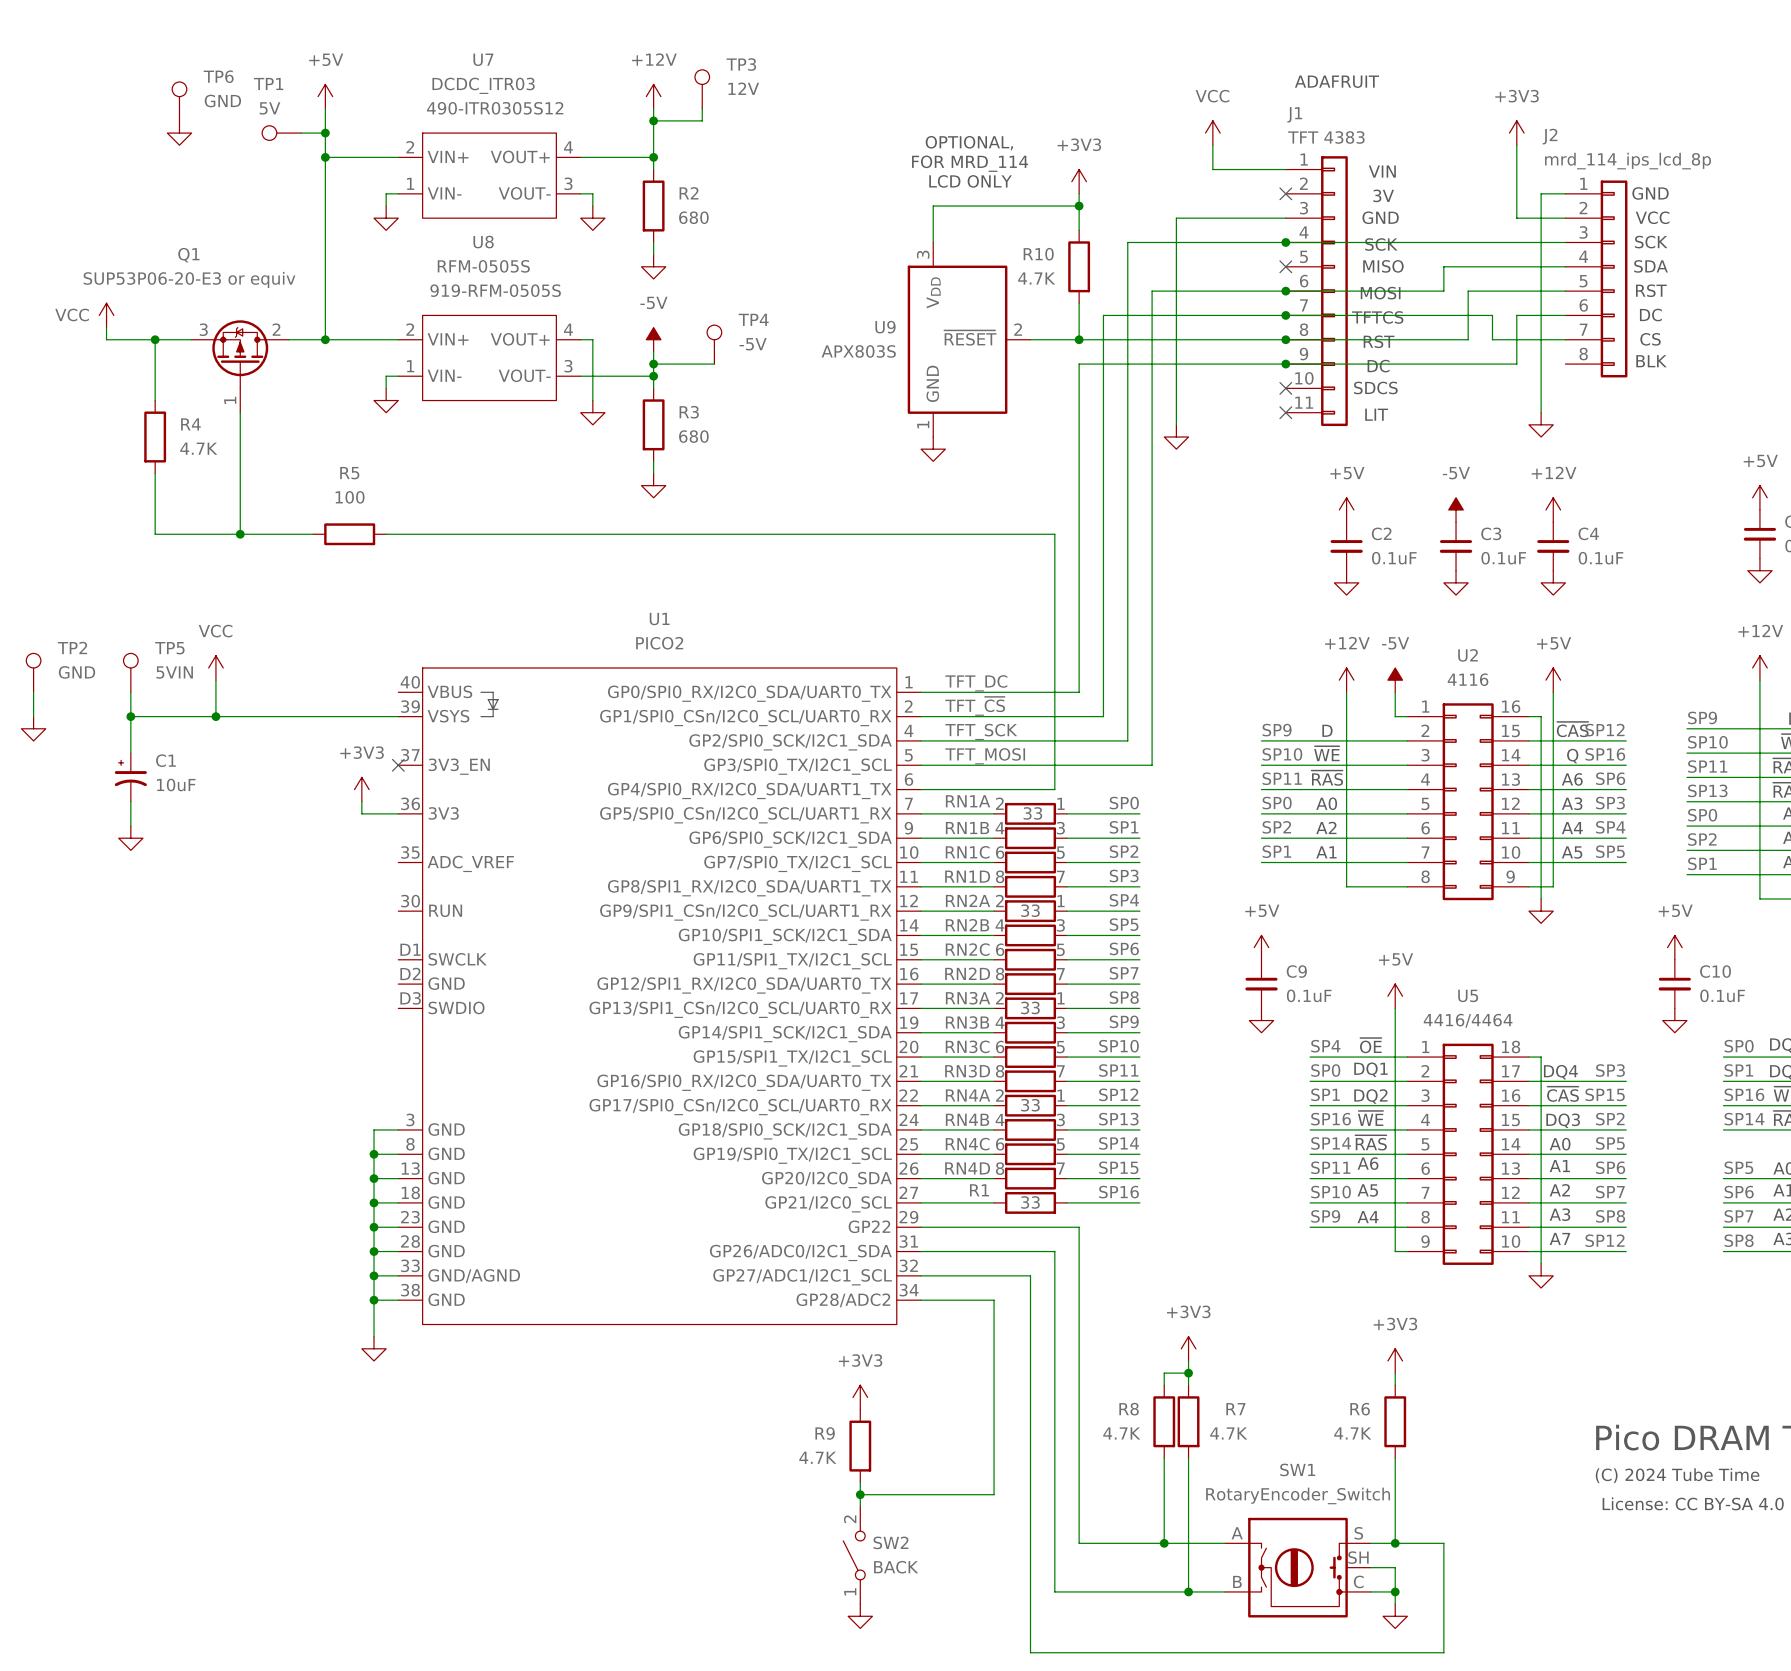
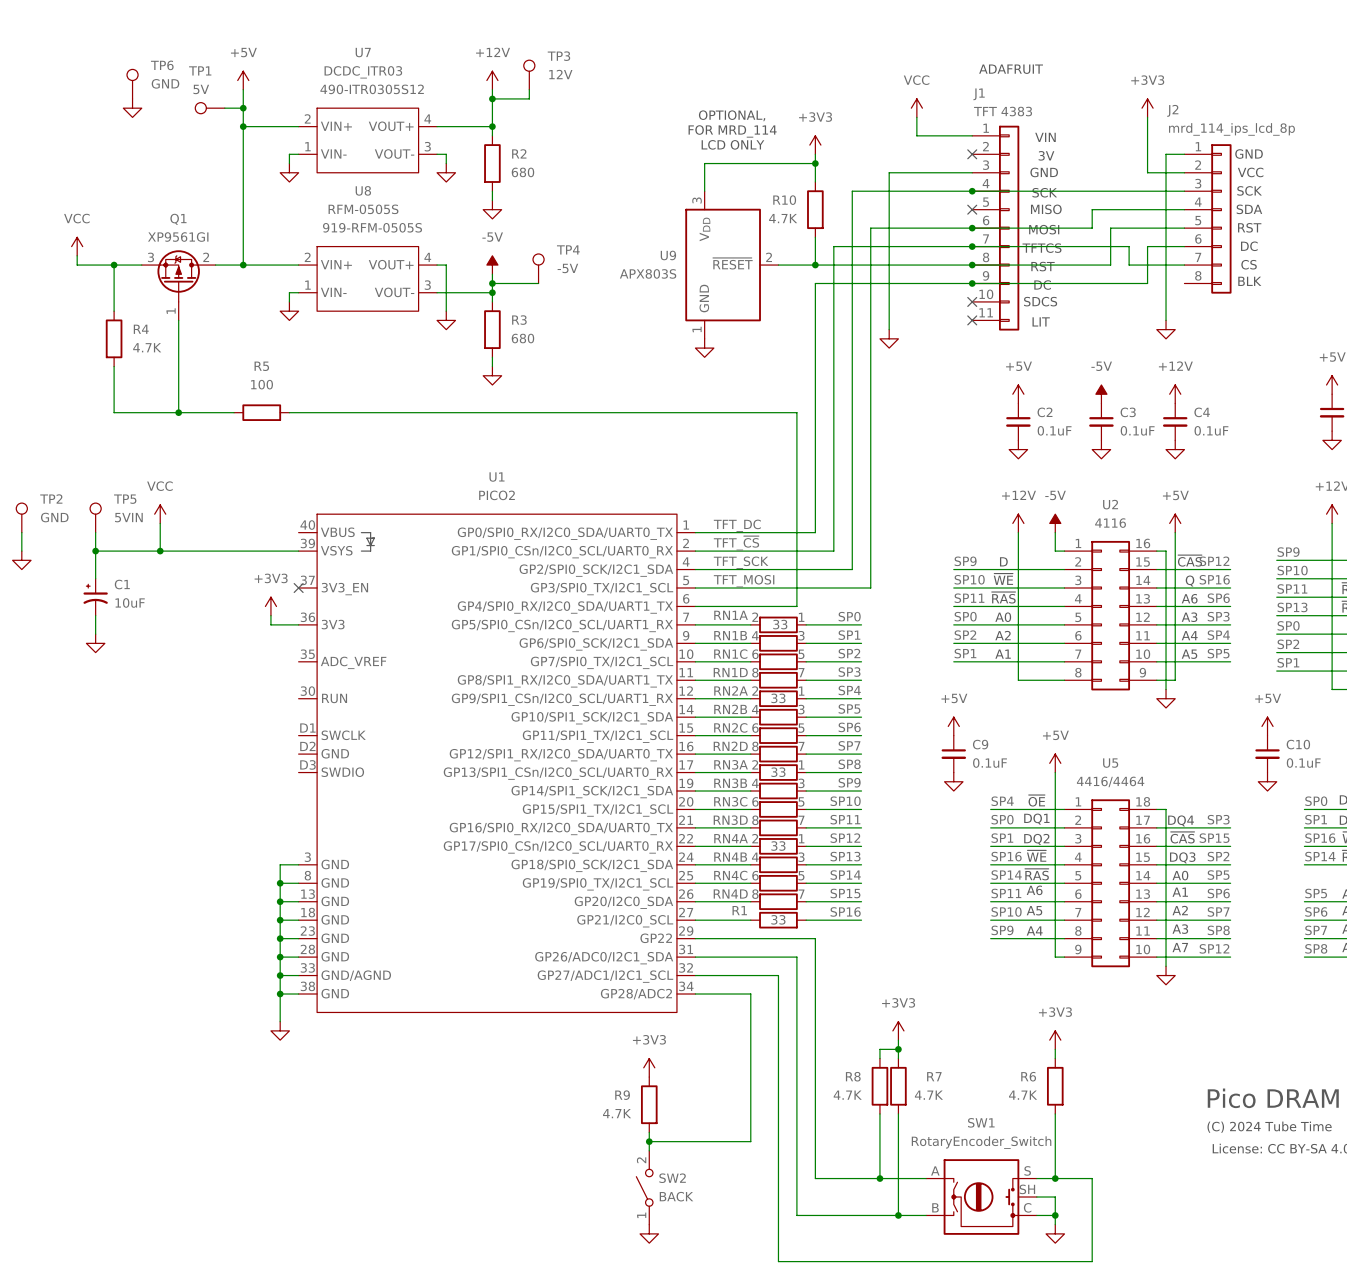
Q1 name position: Q1 (188, 255) -> Q1 (178, 219)
Q1 value: SUP53P06-20-E3 or equiv (189, 279) -> XP9561GI (178, 237)
power symbol text position: VCC (72, 314) -> VCC (76, 218)

